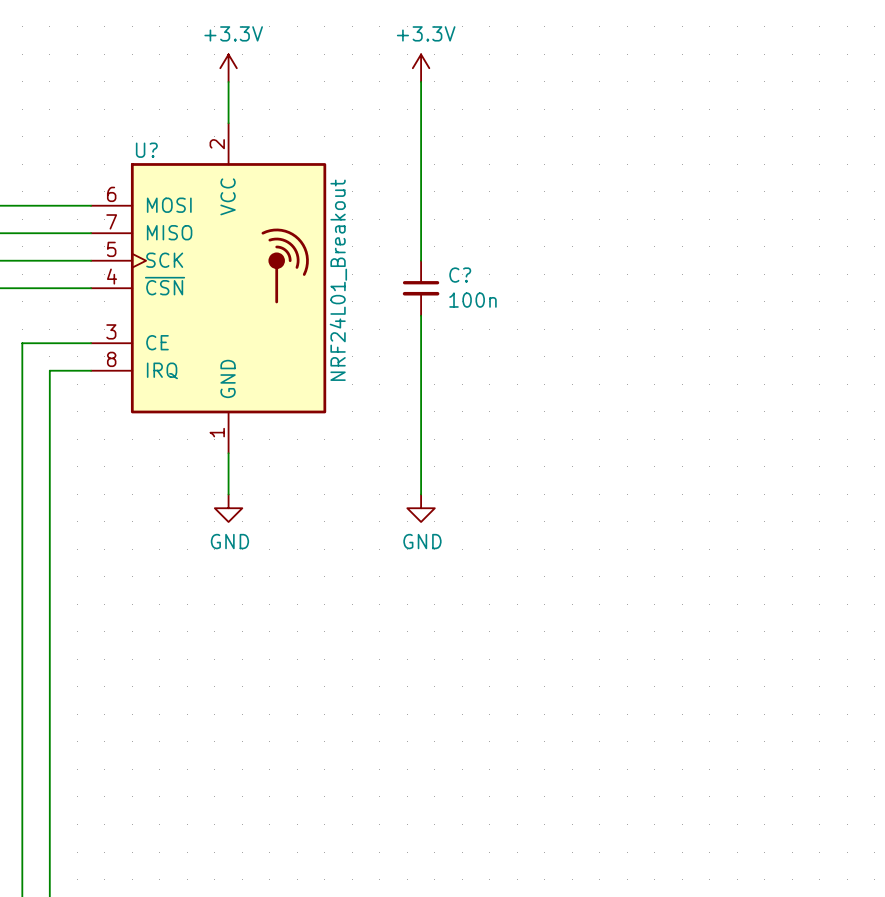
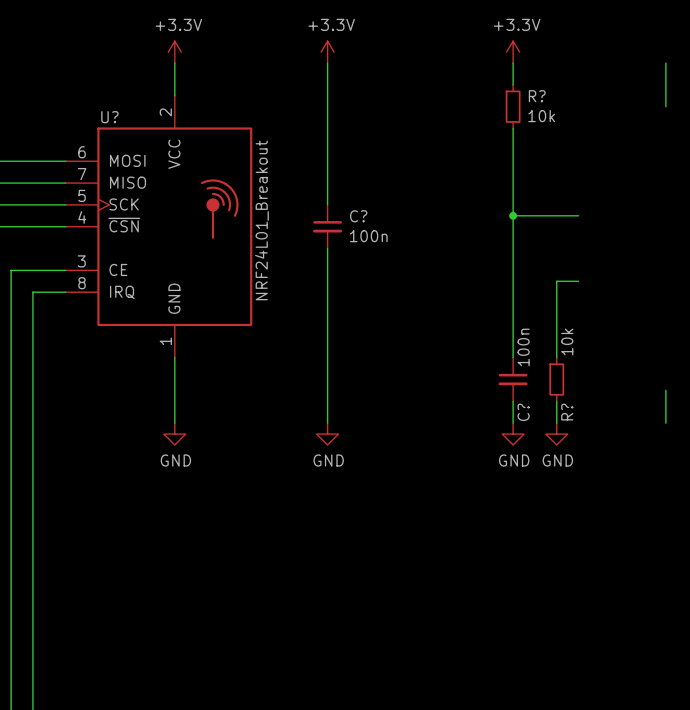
power symbol: none -> +3.3V (513, 52)
wire: none -> (513, 63) (513, 84)
wire: none -> (665, 63) (665, 106)
R?: none -> 10k (513, 106)
wire: none -> (513, 128) (513, 357)
wire: none -> (513, 215) (578, 215)
junction: none -> (513, 215)
wire: none -> (578, 281) (556, 281) (556, 357)
C?: none -> 100n (513, 379)
R?: none -> 10k (556, 379)
wire: none -> (174, 390) (174, 423)
wire: none -> (327, 390) (327, 423)
wire: none -> (665, 390) (665, 423)
power symbol position: GND (228, 508) -> GND (174, 434)
power symbol position: GND (421, 508) -> GND (327, 434)
wire: none -> (513, 401) (513, 423)
wire: none -> (556, 401) (556, 423)
power symbol: none -> GND (513, 434)
power symbol: none -> GND (556, 434)

